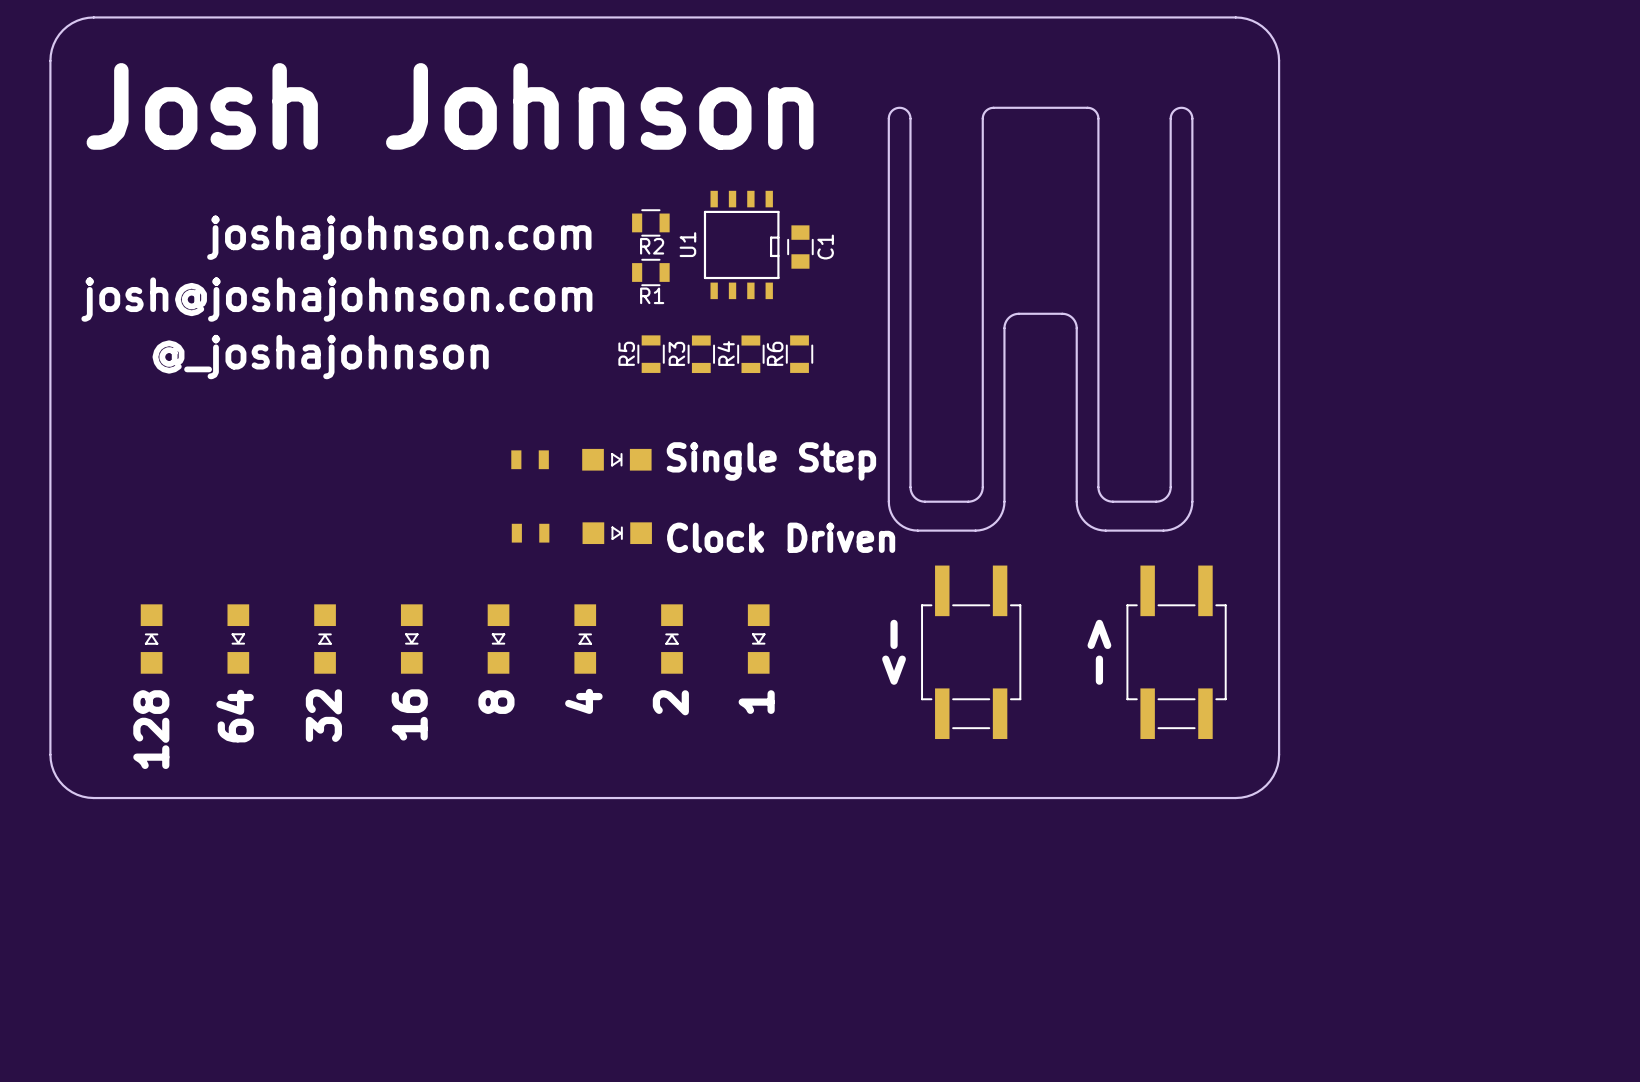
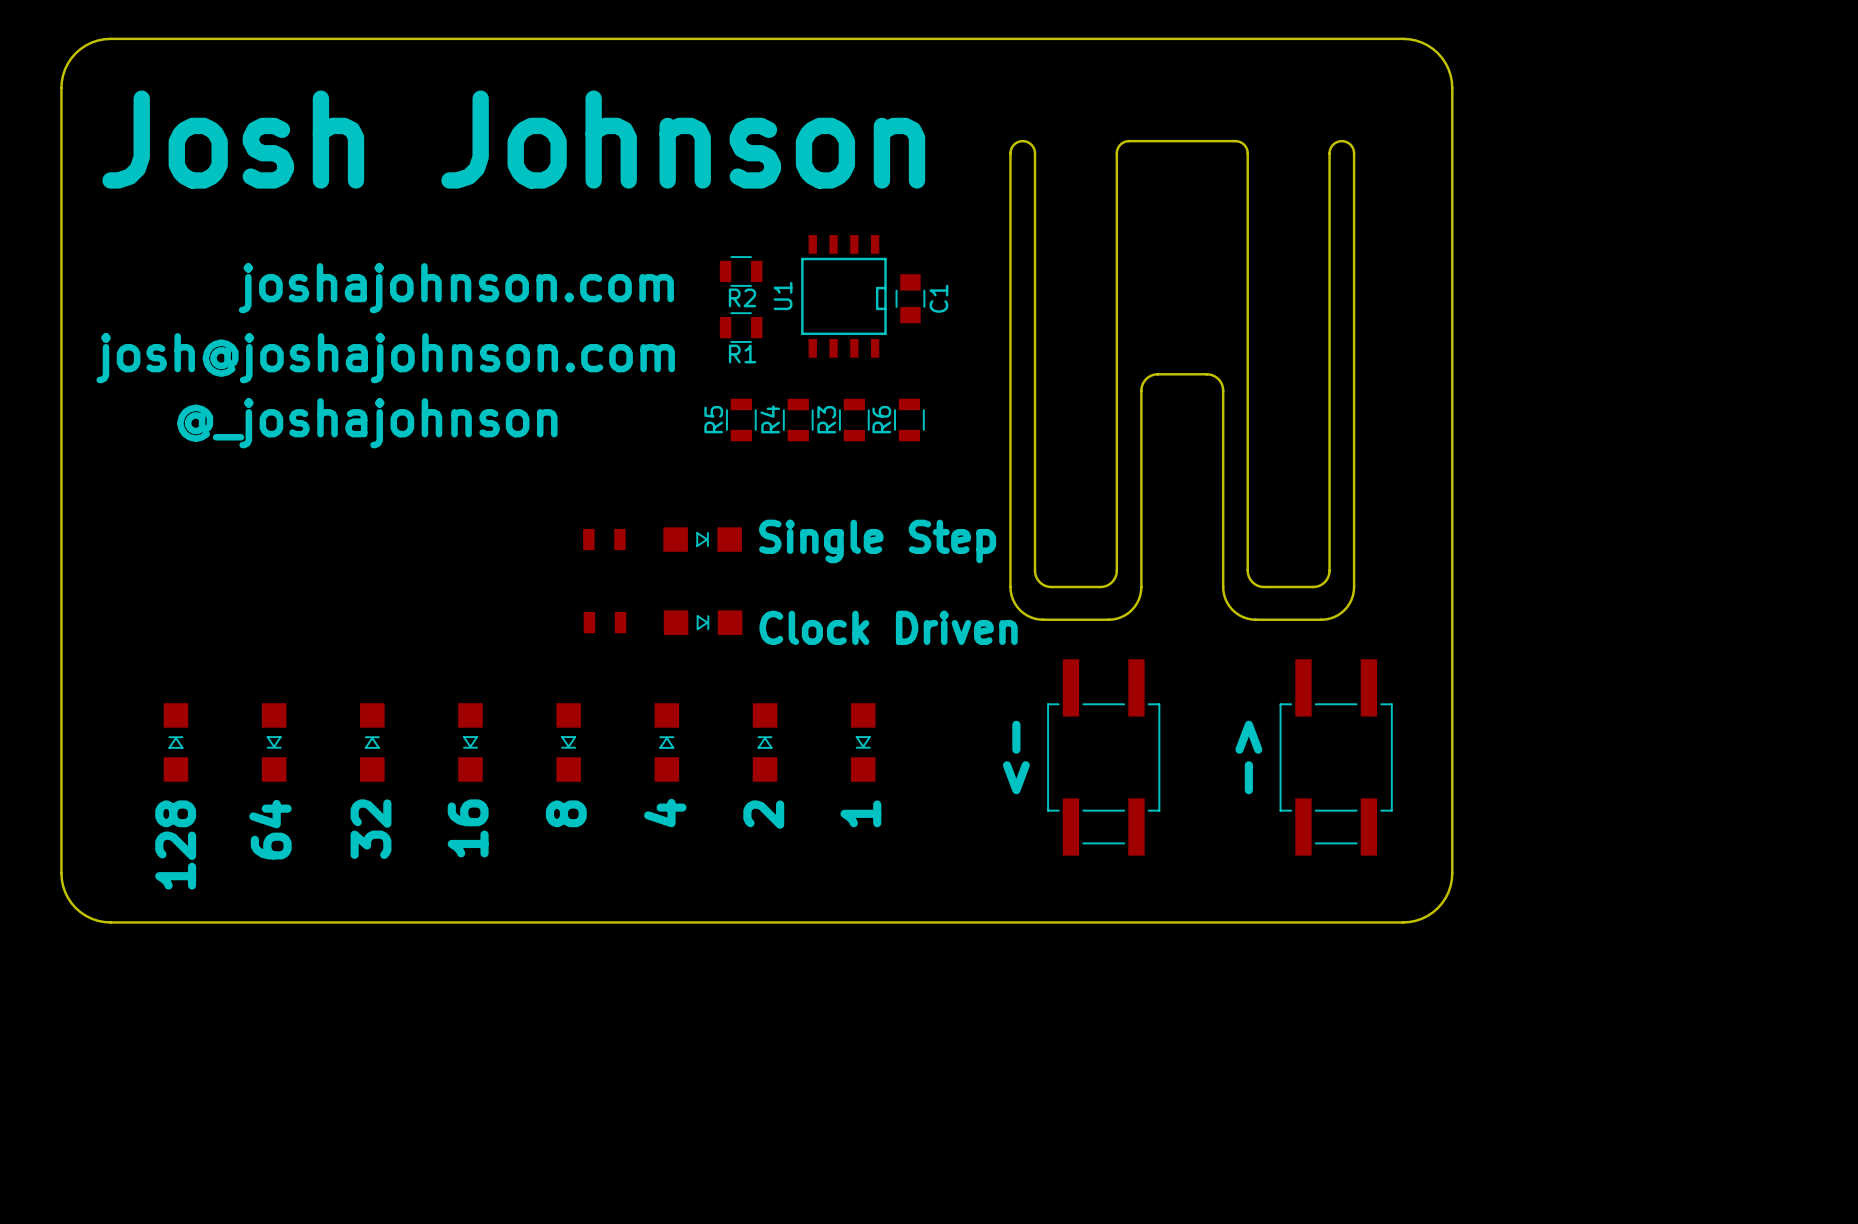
R3 name: R3 (676, 353) -> R4 (770, 419)
R4 name: R4 (726, 353) -> R3 (826, 419)

